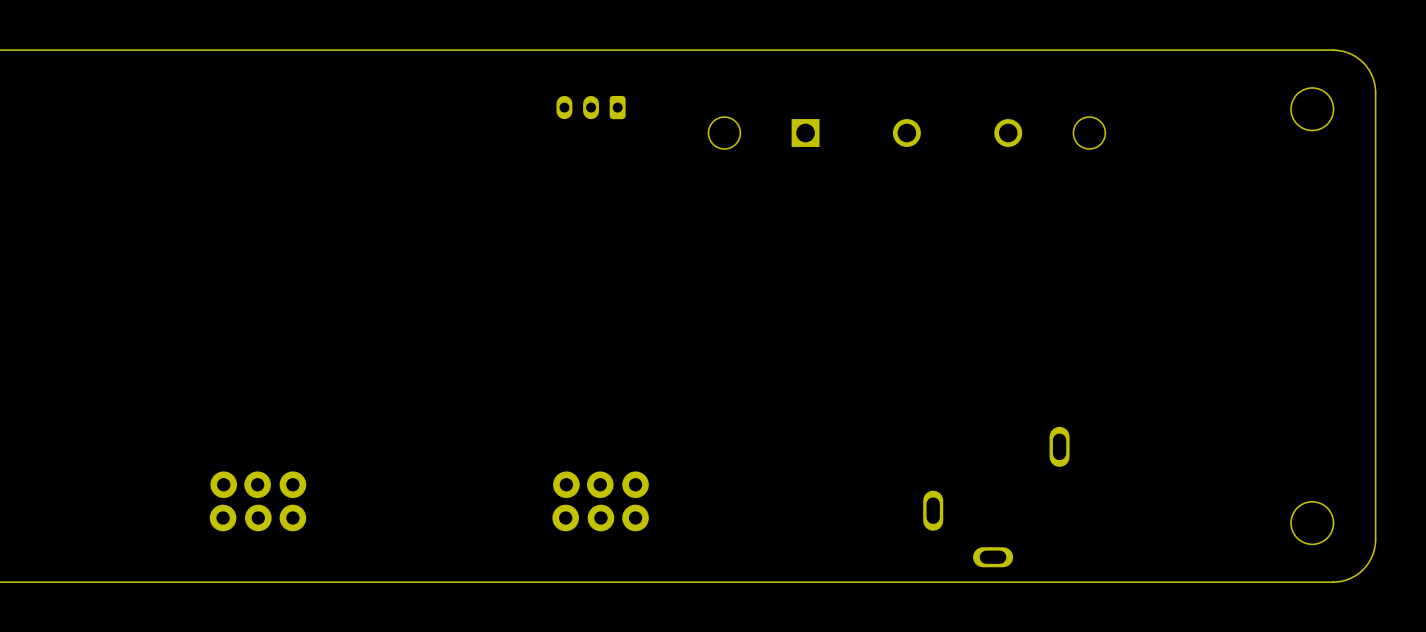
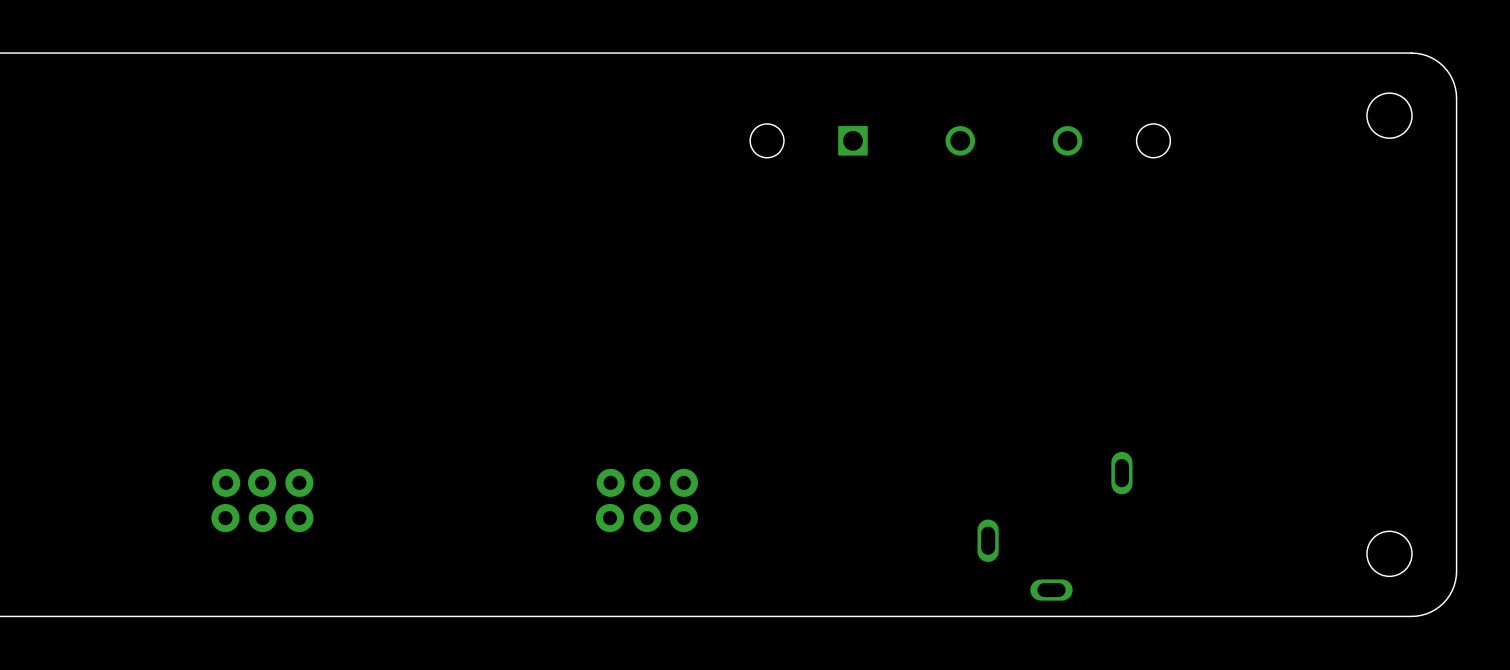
part: (591, 107) -> none
part position: (257, 501) -> (262, 500)
part position: (600, 501) -> (646, 500)

